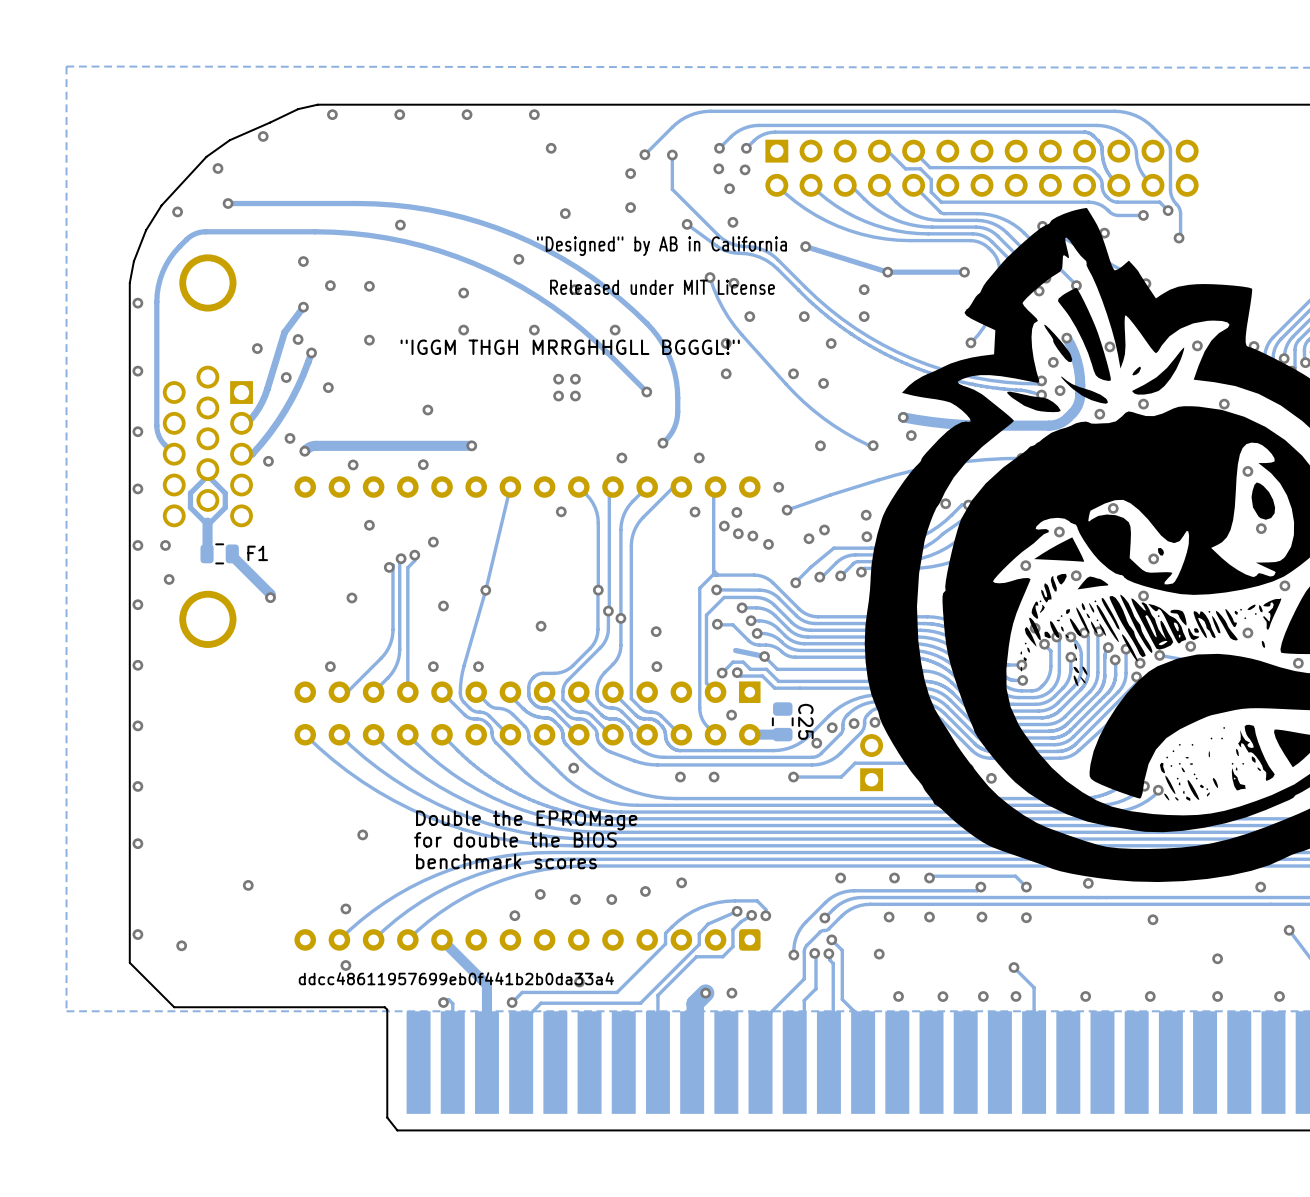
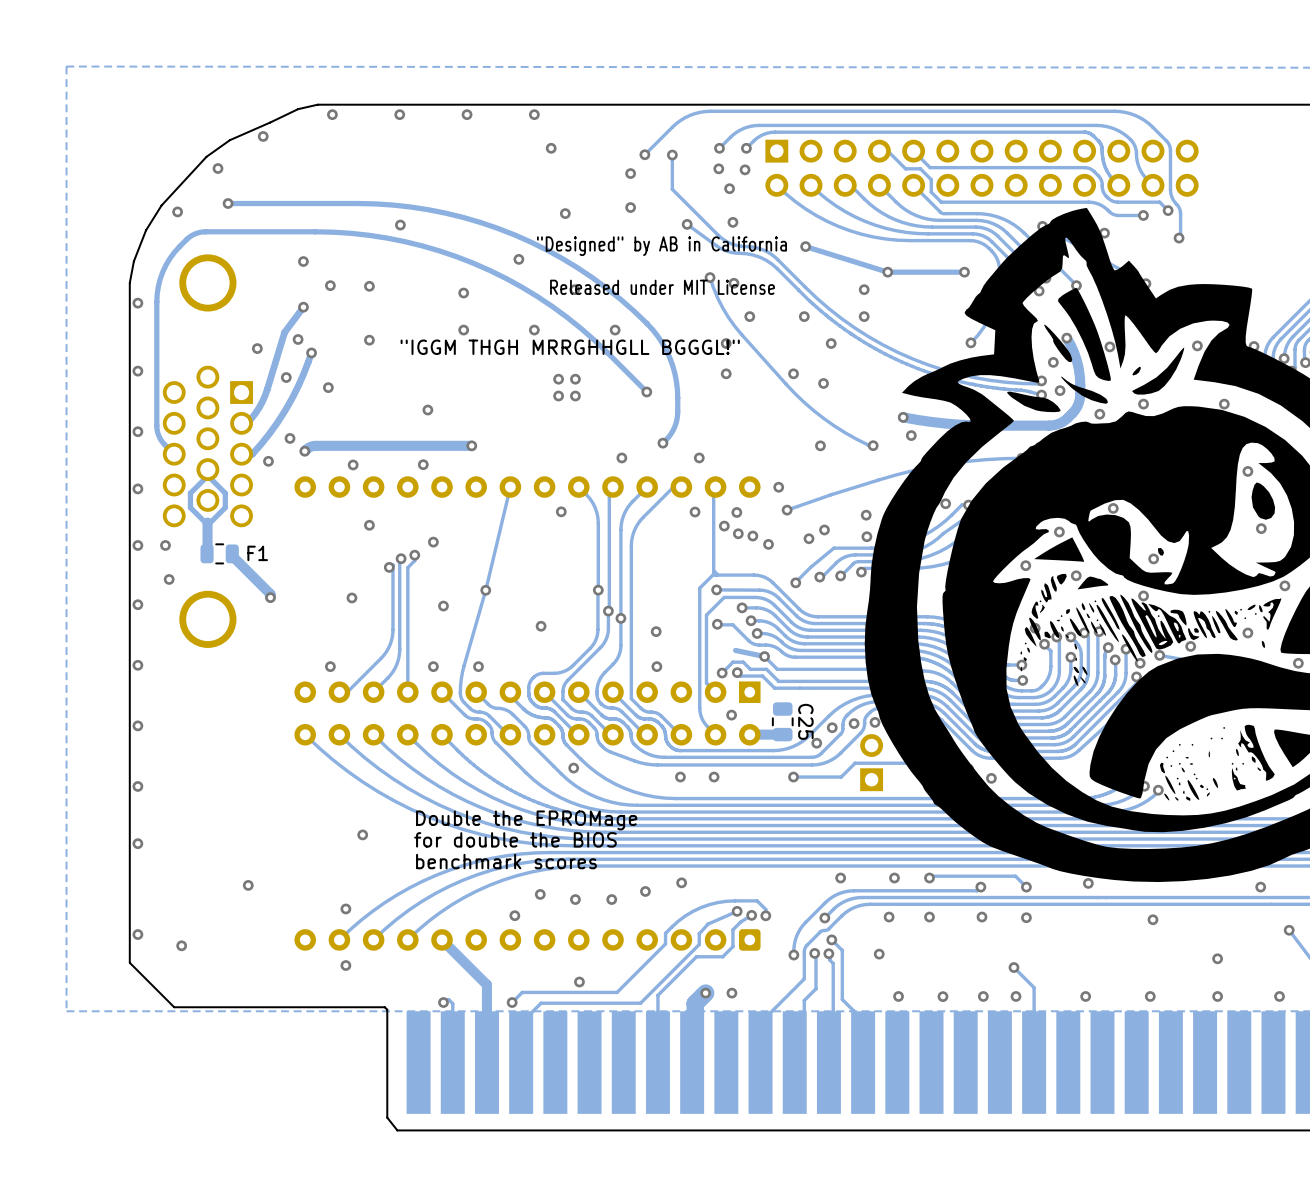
text: ddcc48611957699eb0f441b2b0da33a4 (456, 978) -> none

